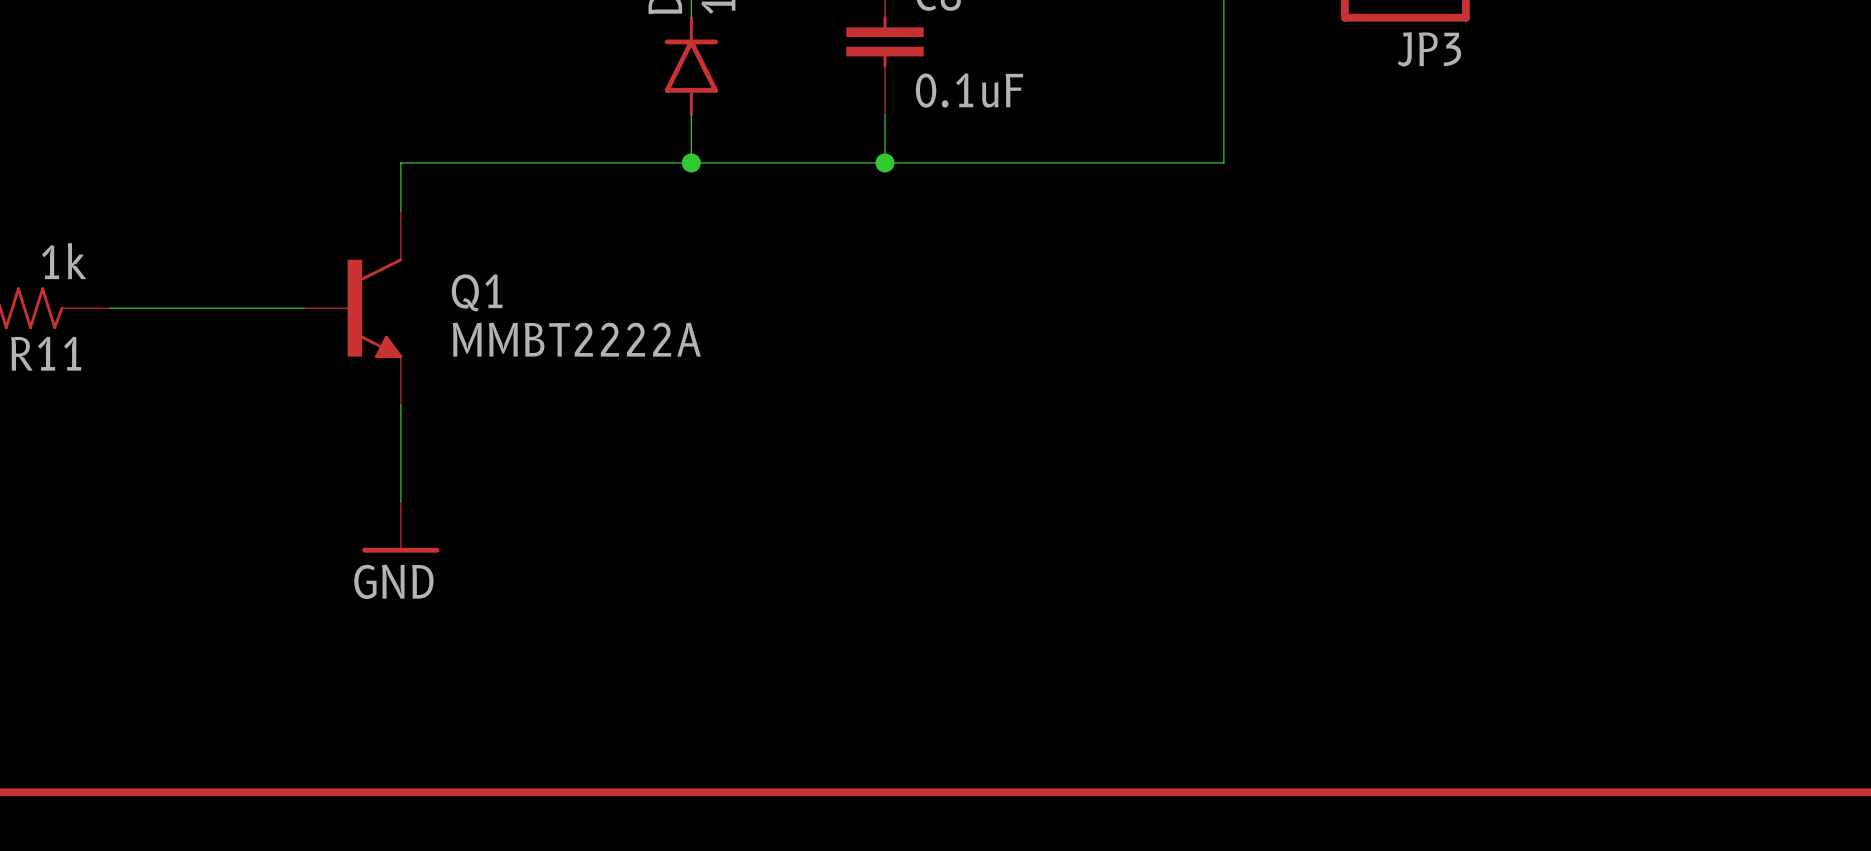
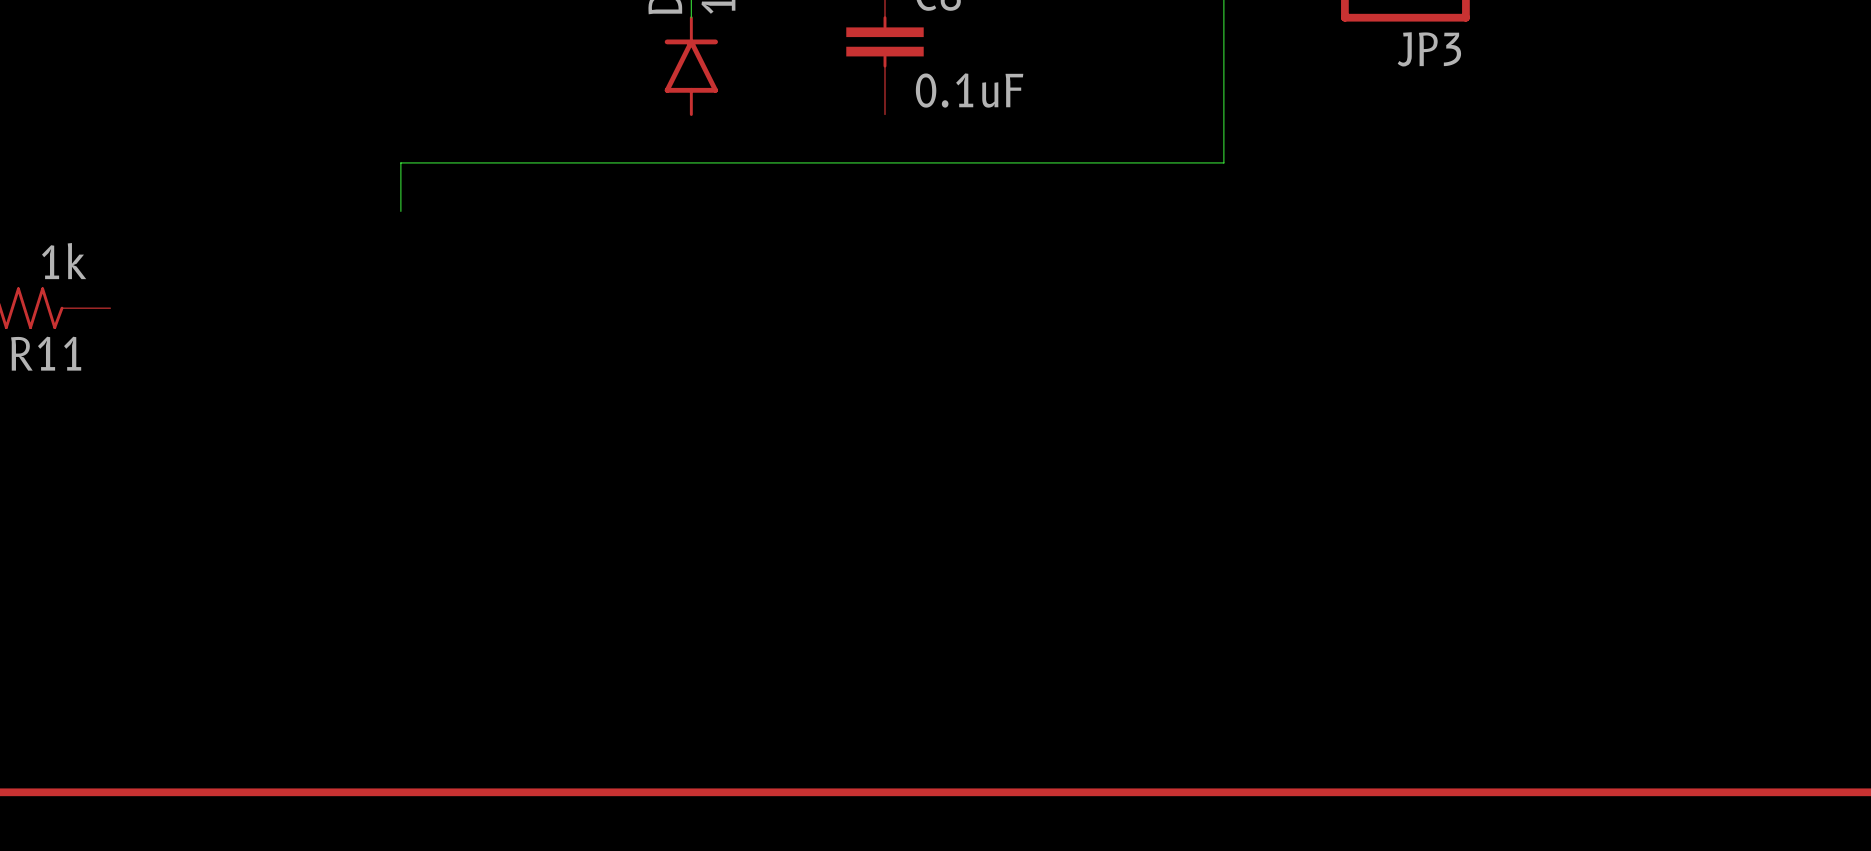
wire: (691, 114) (691, 162) -> none
wire: (884, 114) (884, 162) -> none
junction: (691, 162) -> none
junction: (884, 162) -> none
wire: (110, 308) (304, 308) -> none
Q1: MMBT2222A (353, 308) -> none
wire: (400, 405) (400, 501) -> none
power symbol: GND (400, 527) -> none

